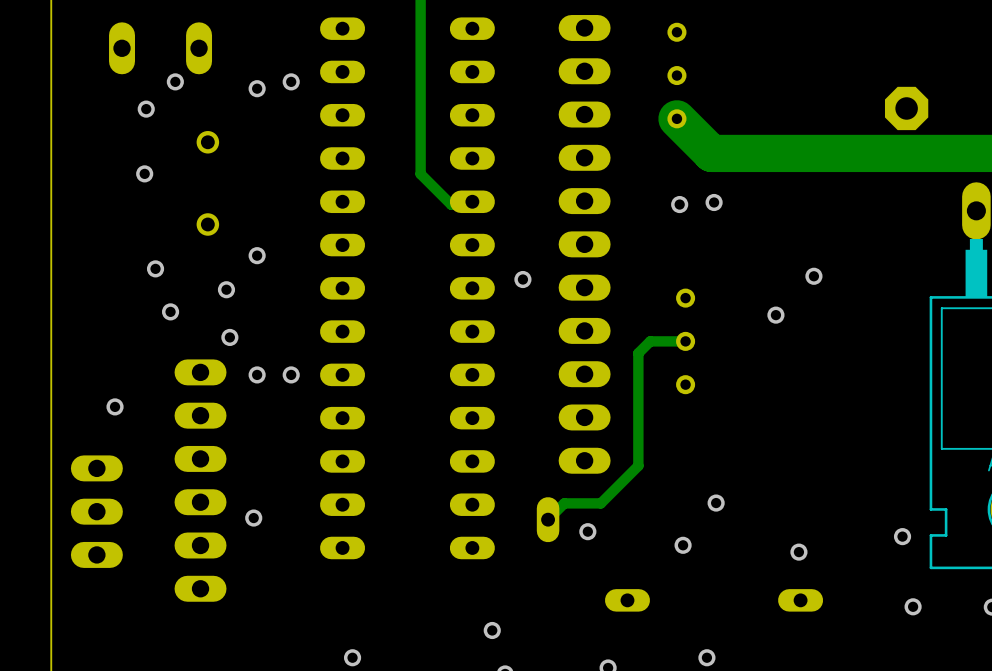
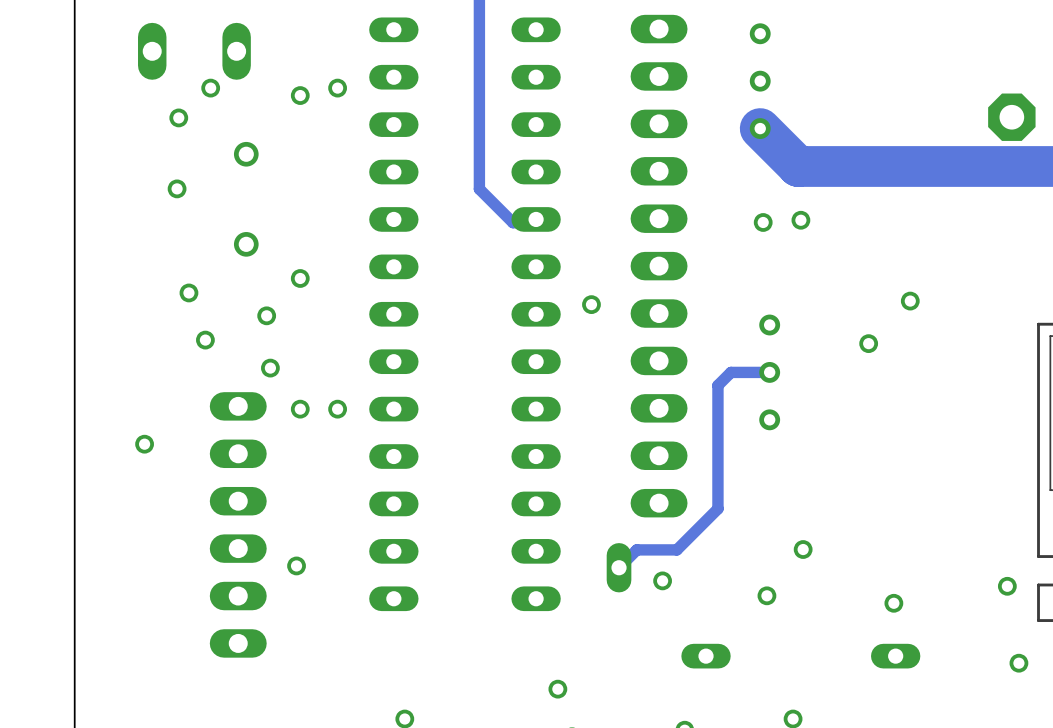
part: (96, 511) -> none

